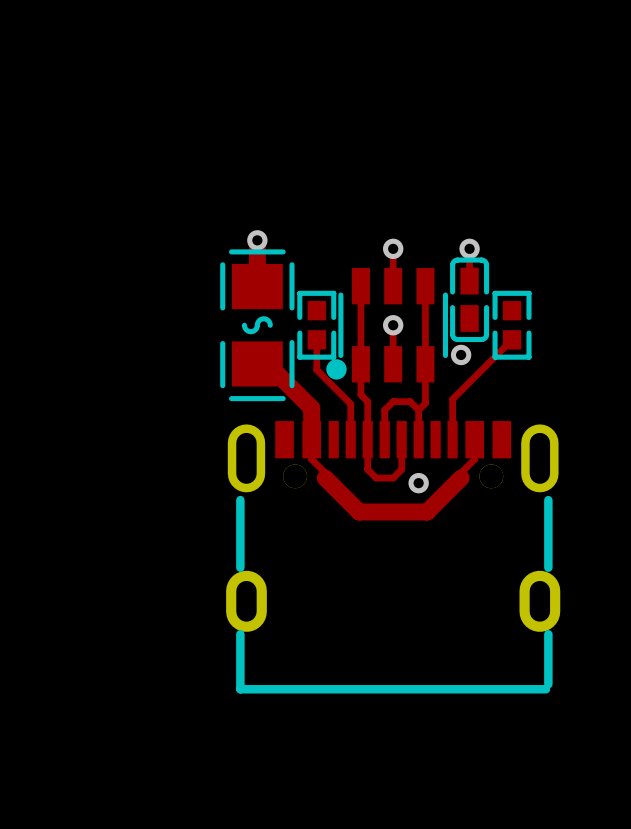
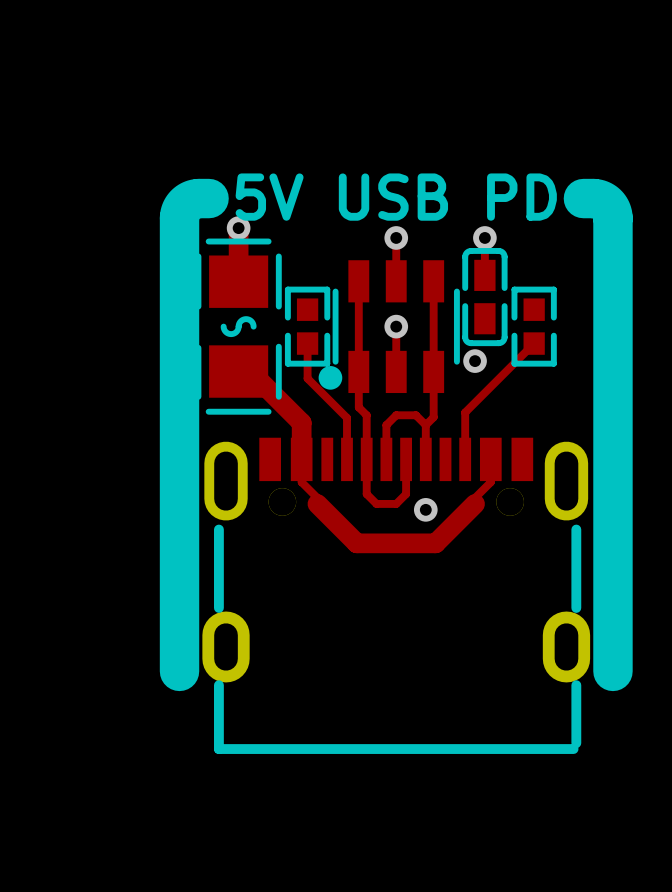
text: none -> 5V USB PD (396, 197)
line: none -> (209, 198) (189, 201) (182, 208) (179, 218) (179, 671)
line: none -> (583, 198) (603, 201) (610, 208) (612, 218) (612, 671)

